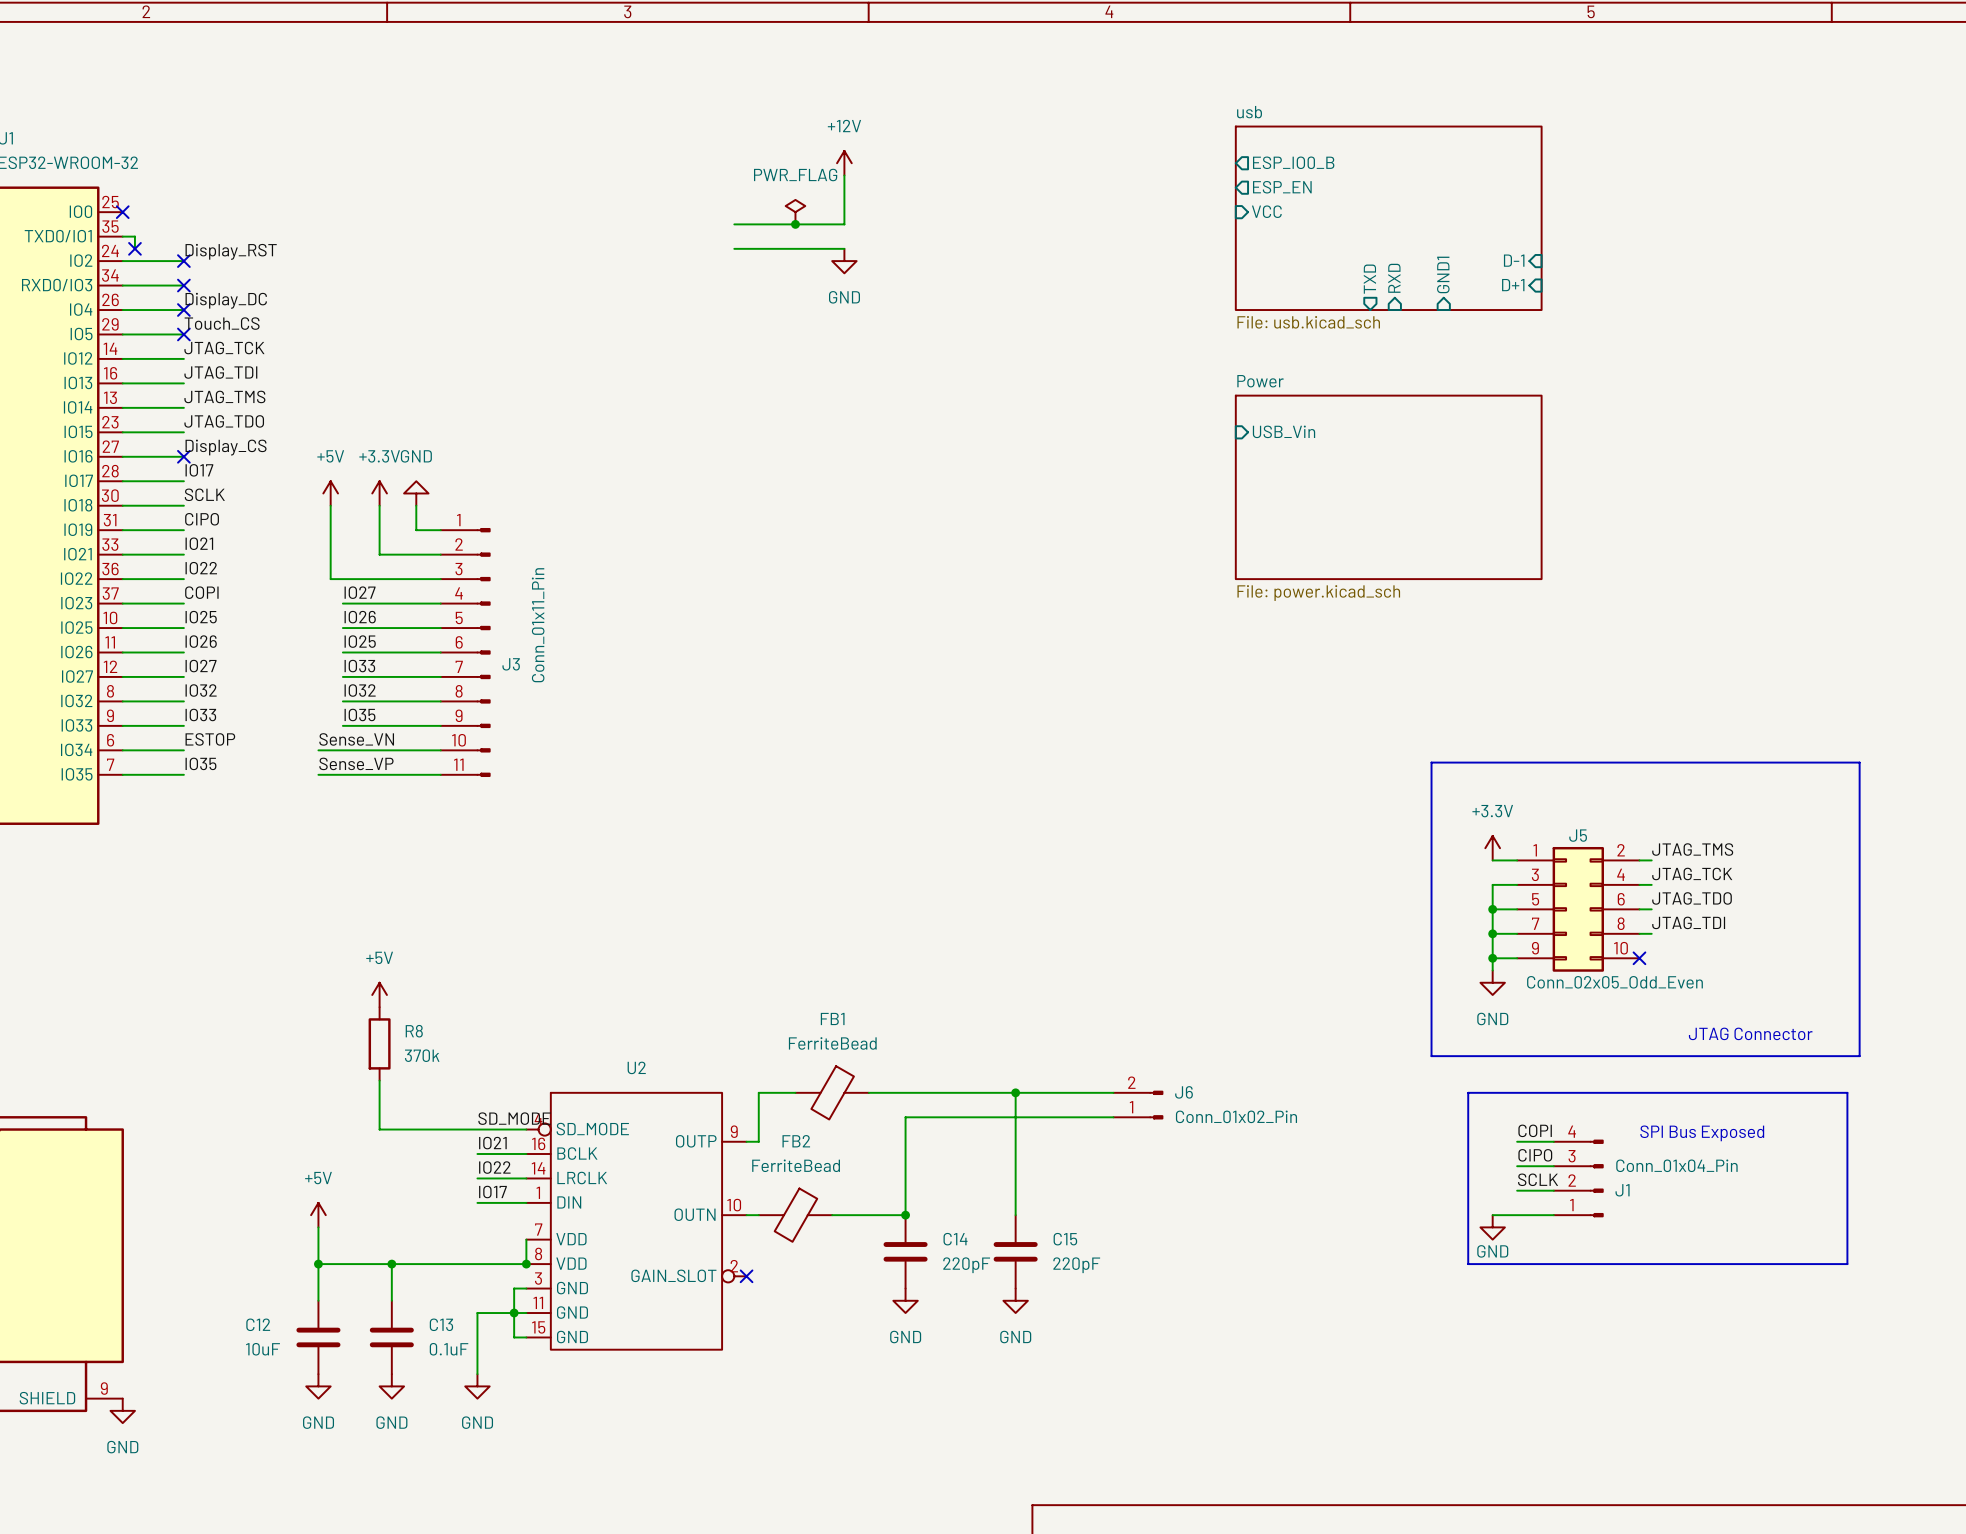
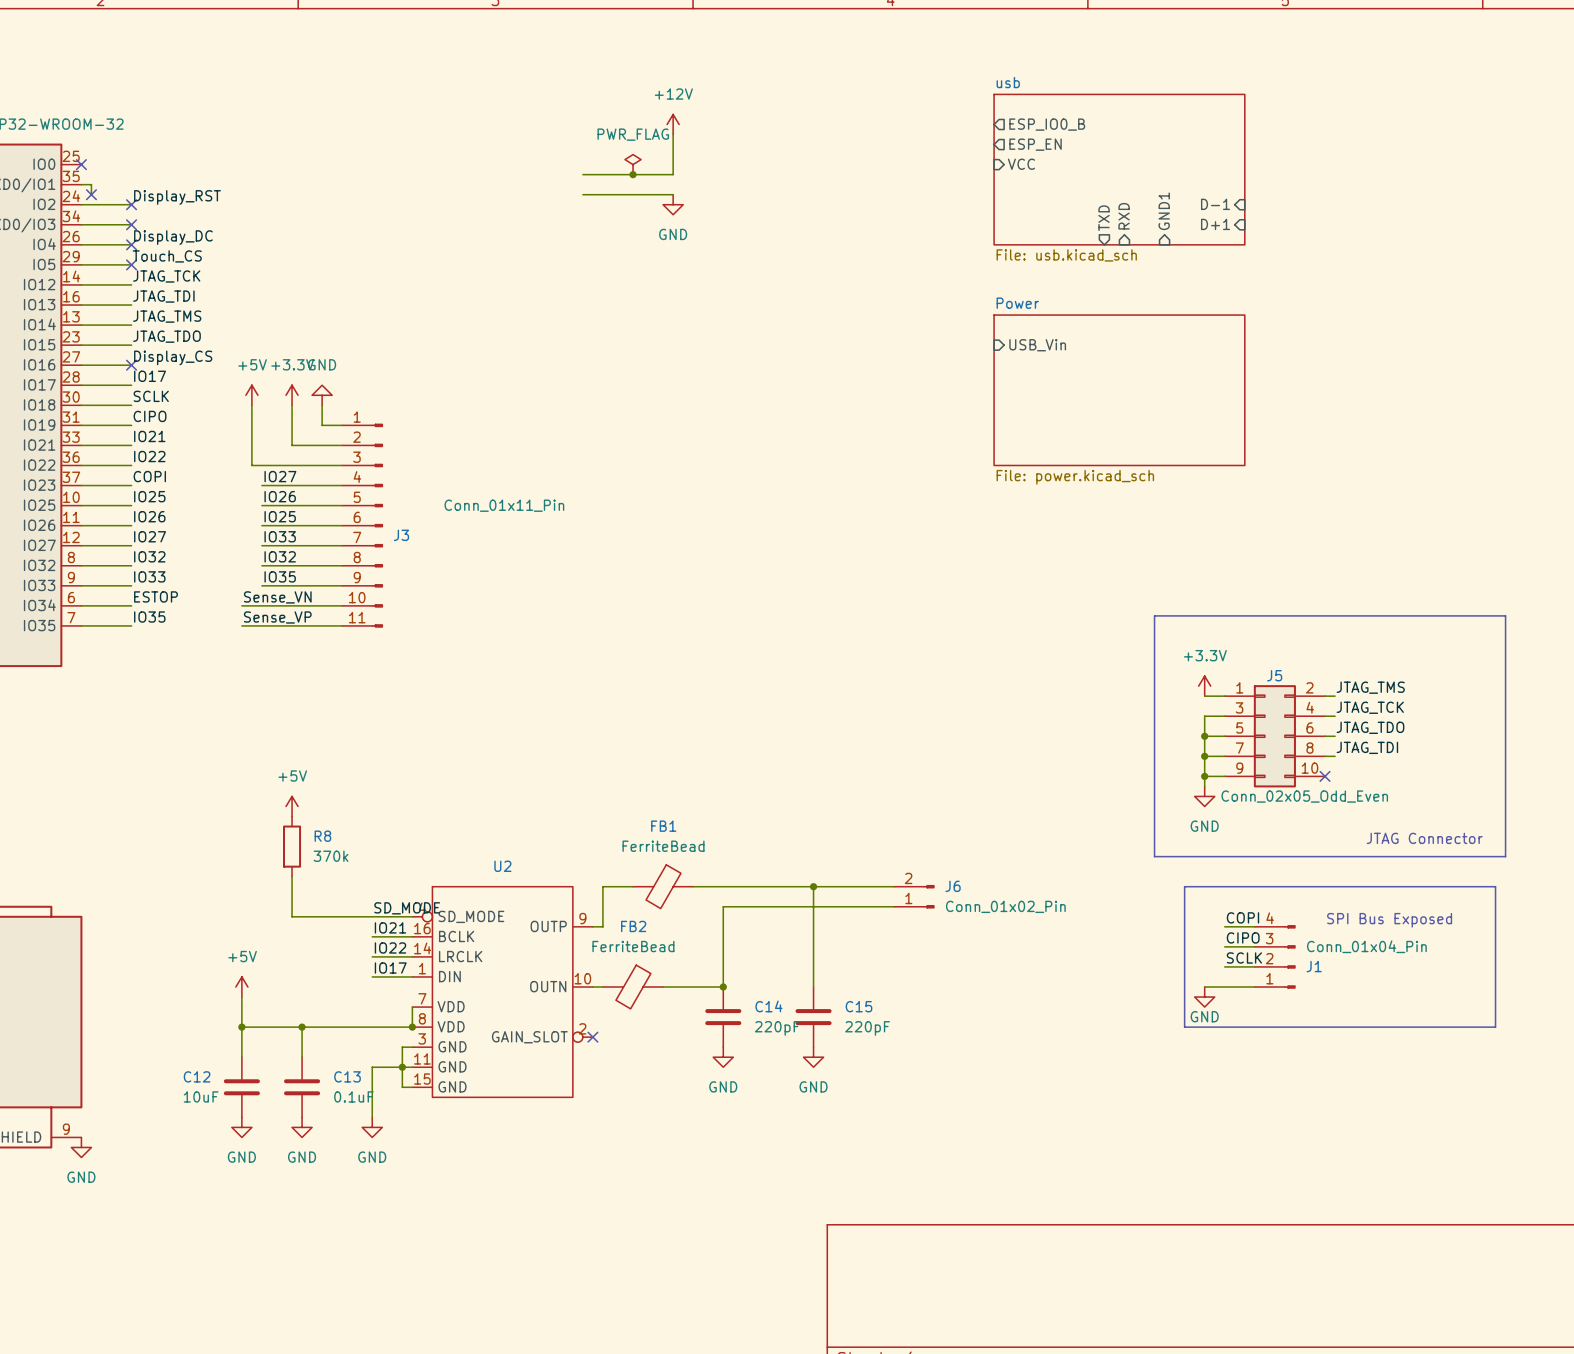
J3 value rotation: 0° (538, 625) -> 90° clockwise (504, 505)

